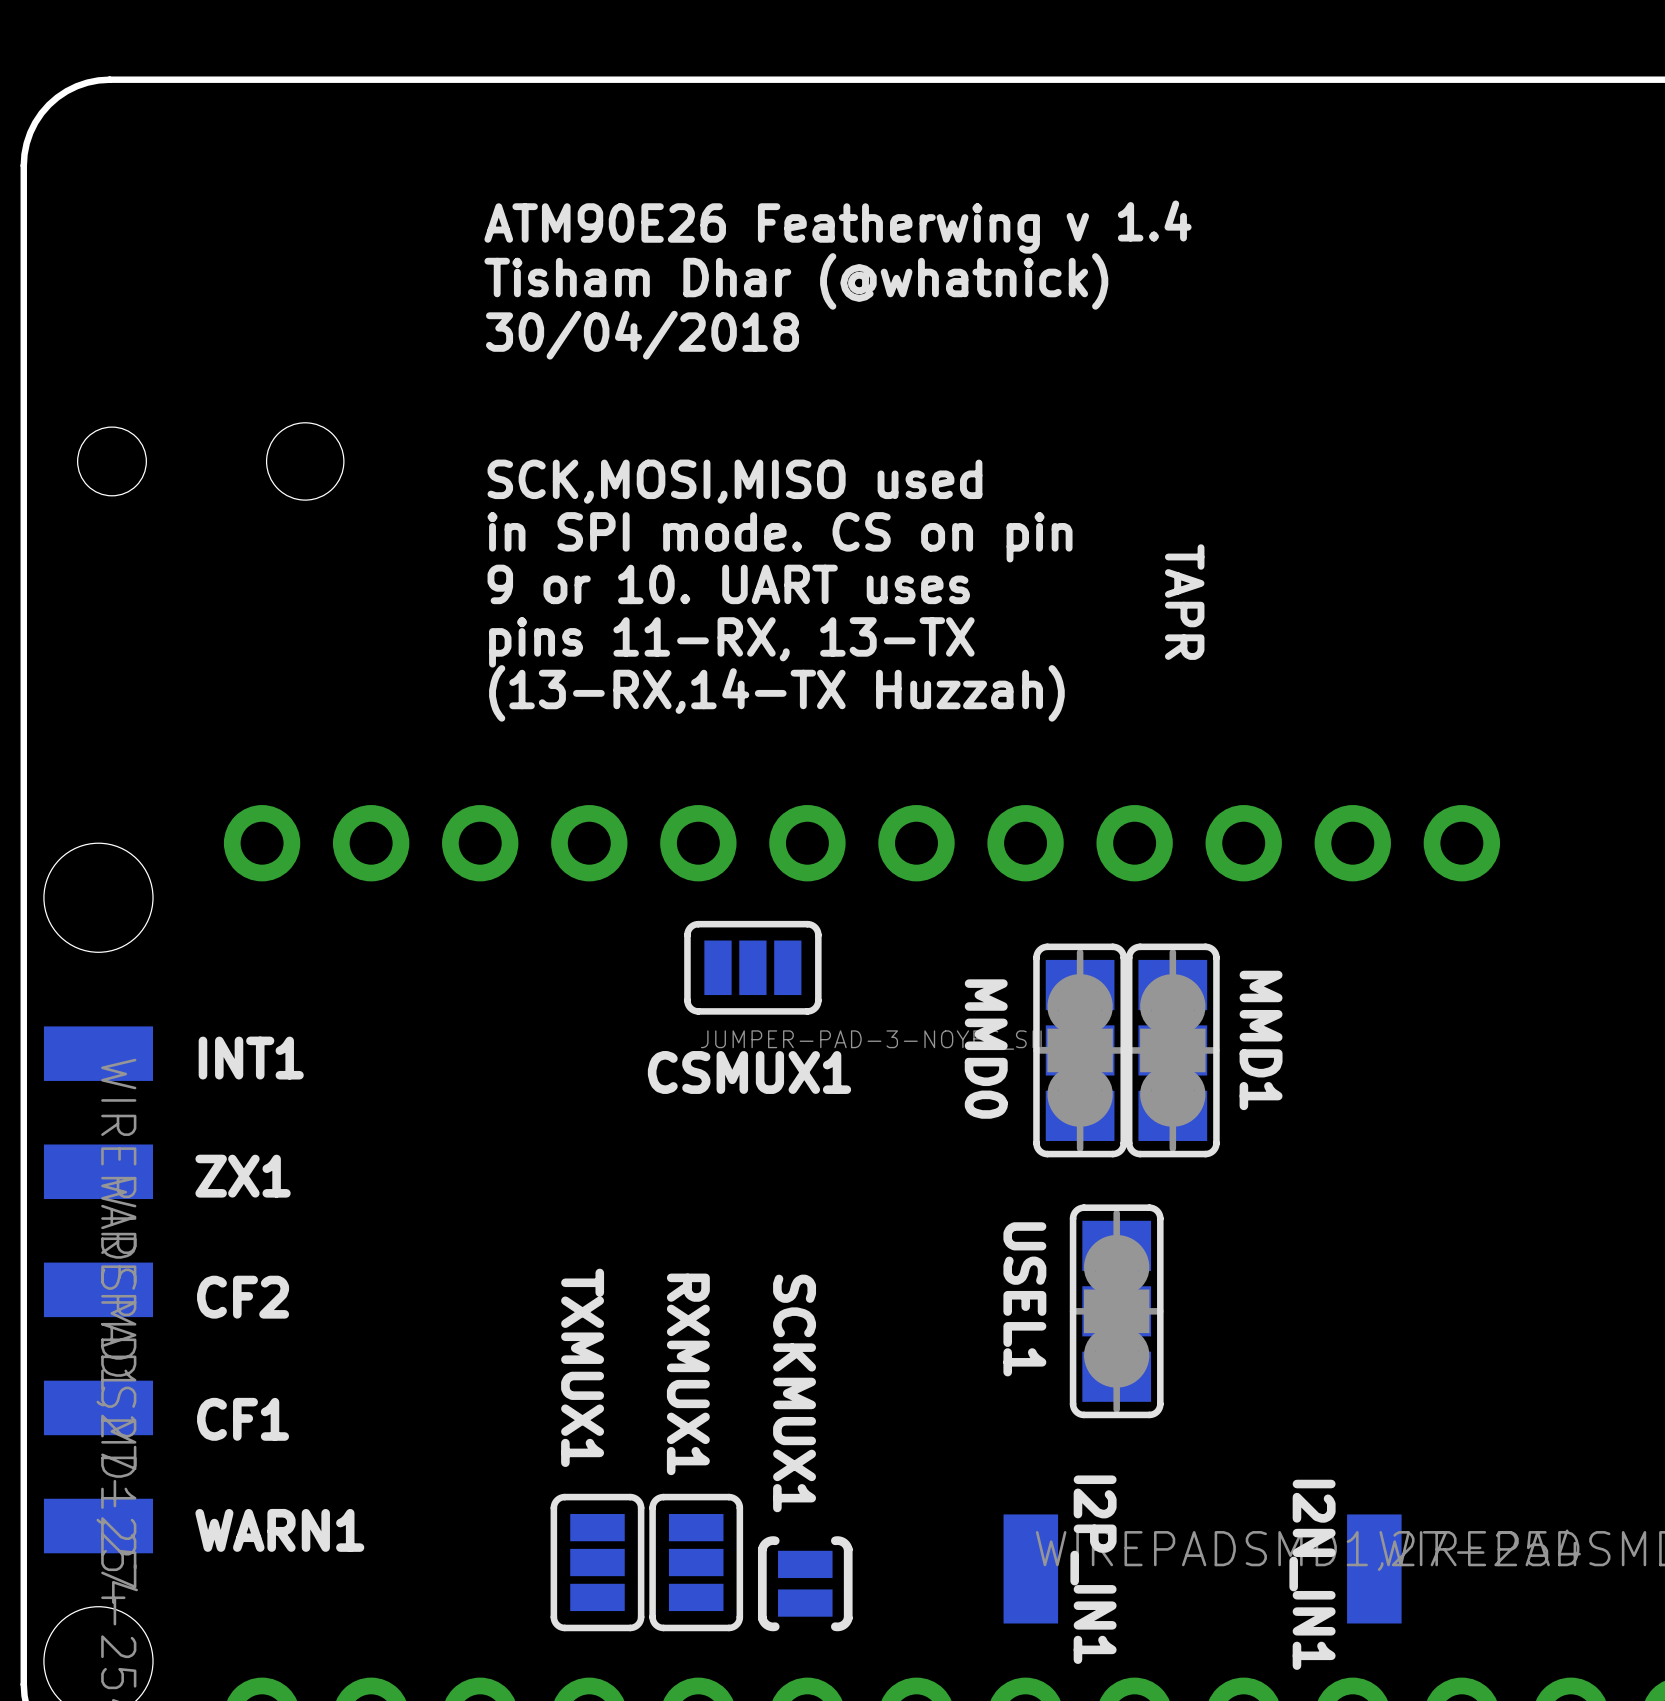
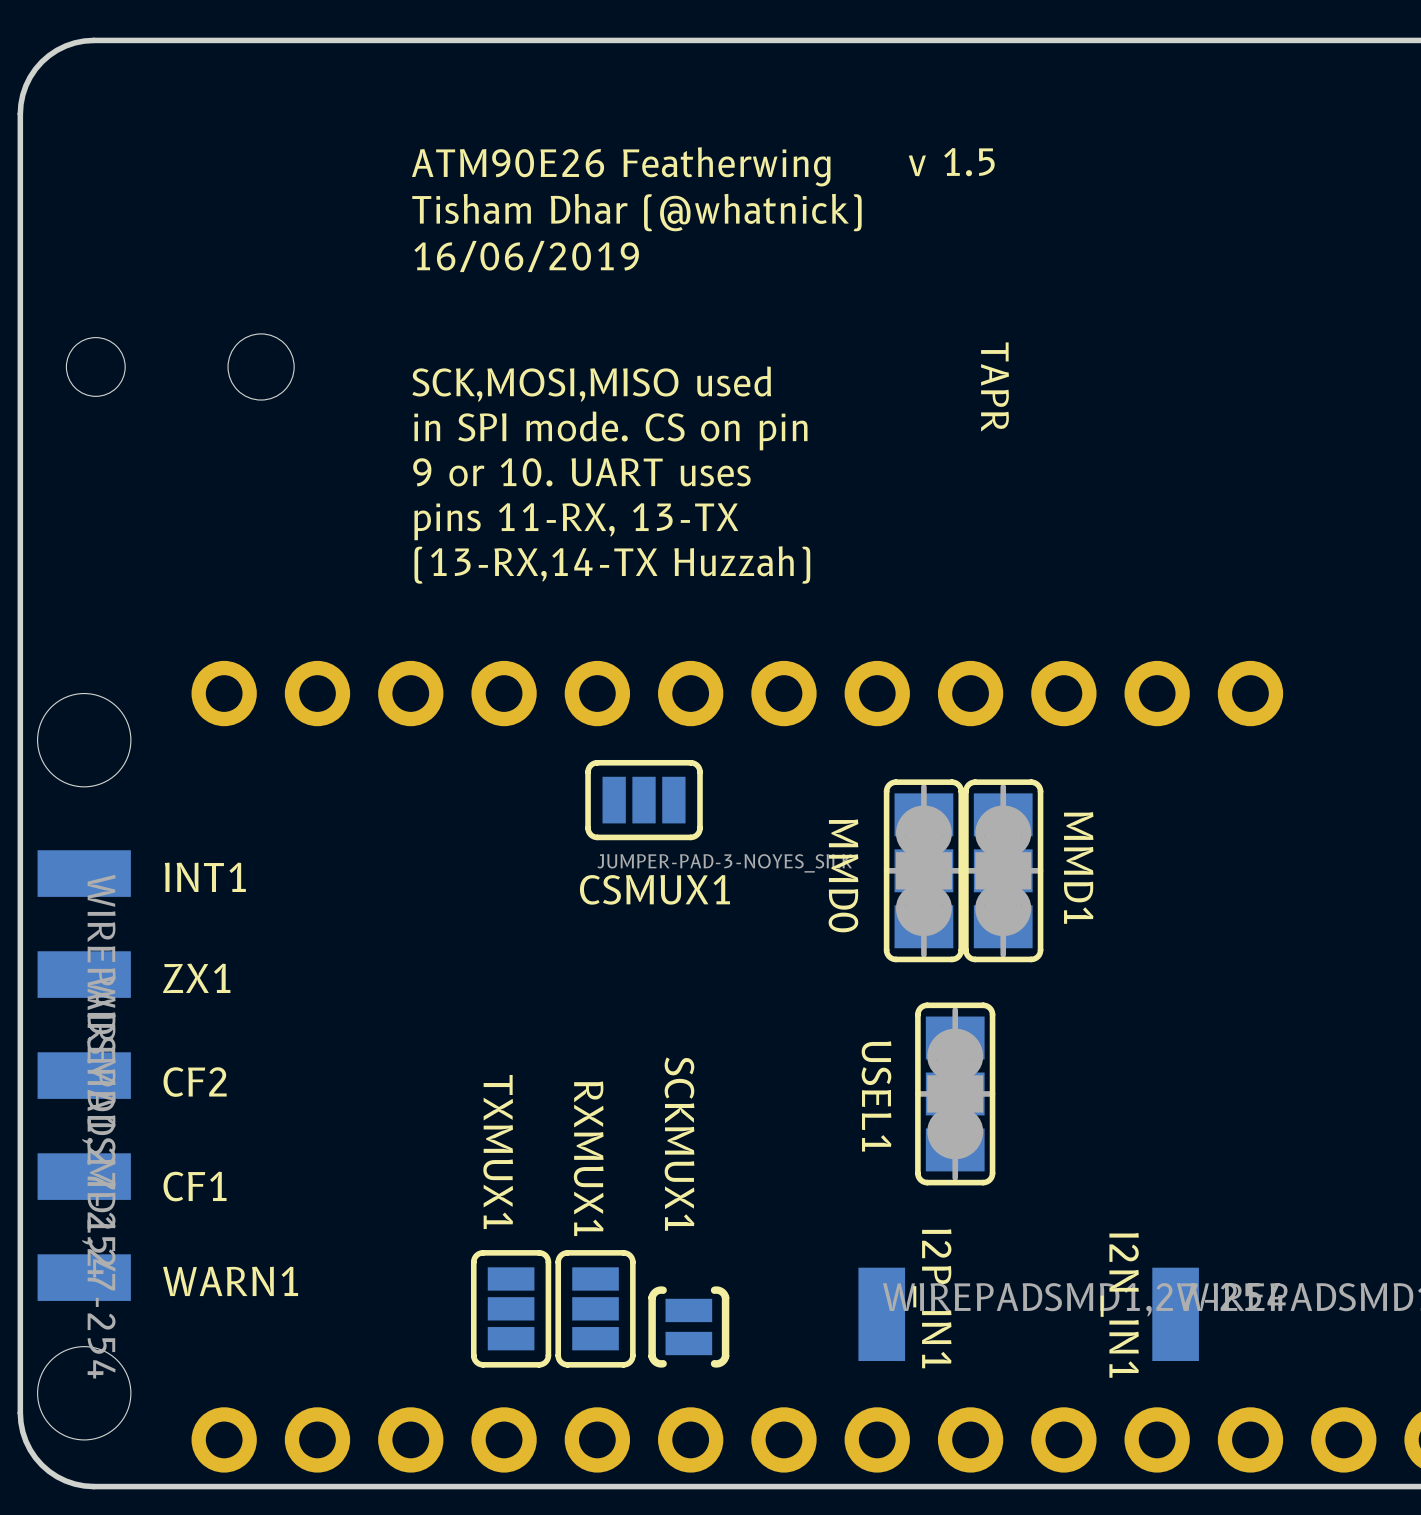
text: v 1.4 (1129, 220) -> v 1.5 (951, 162)
text: 30/04/2018 (642, 335) -> 16/06/2019 (526, 256)
text position: TAPR (1184, 602) -> TAPR (995, 386)

